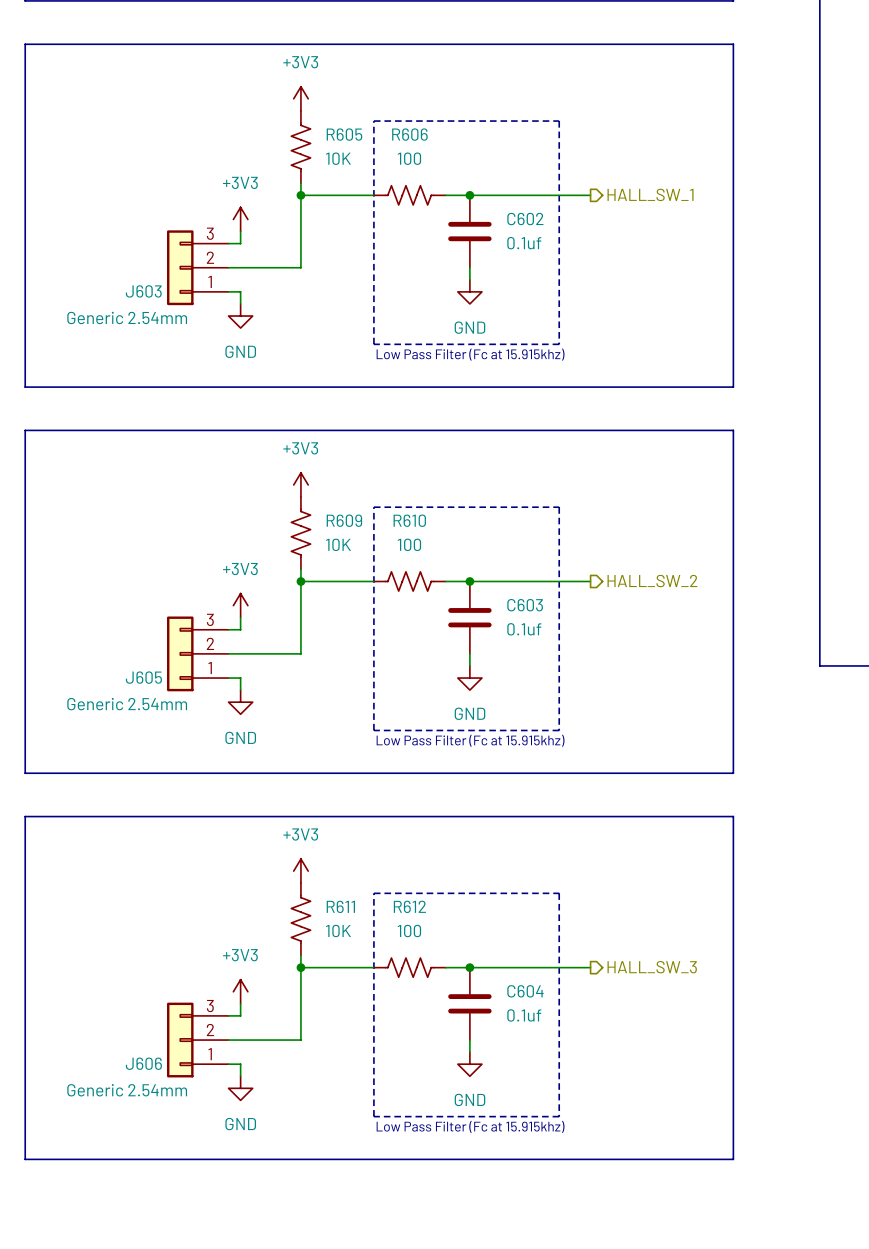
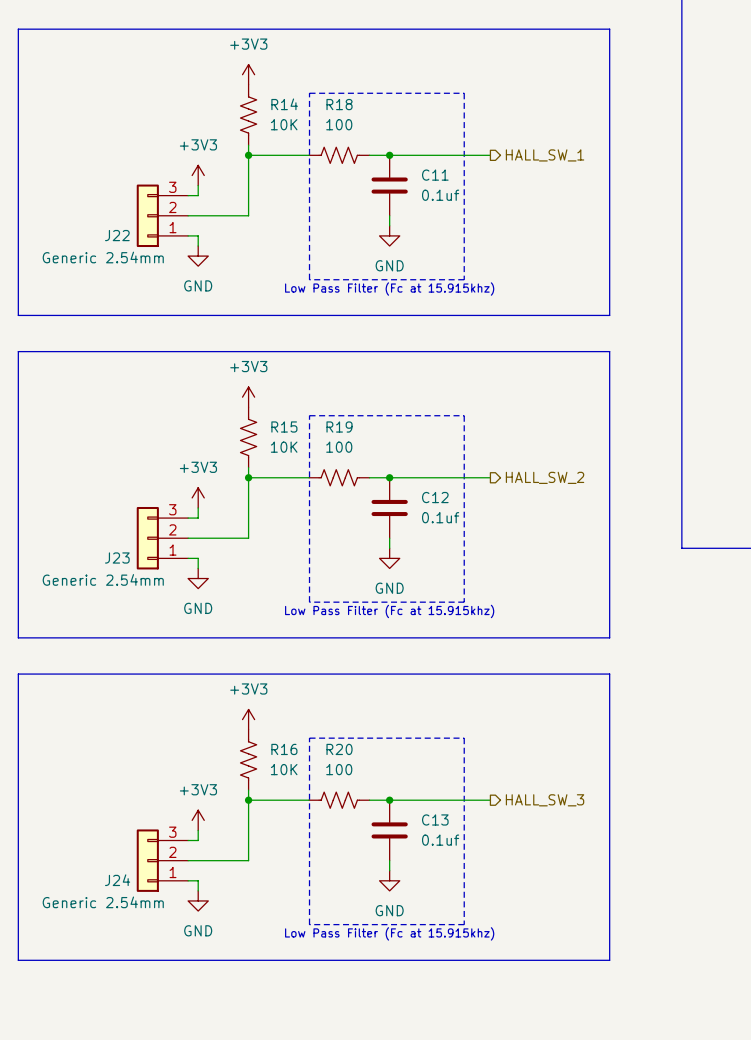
R605 name: R605 (344, 134) -> R14 (284, 104)
R606 name: R606 (409, 134) -> R18 (339, 104)
C602 name: C602 (525, 219) -> C11 (435, 175)
J603 name: J603 (143, 291) -> J22 (117, 235)
R609 name: R609 (344, 520) -> R15 (284, 427)
R610 name: R610 (409, 520) -> R19 (339, 427)
C603 name: C603 (525, 605) -> C12 (435, 497)
J605 name: J605 (143, 677) -> J23 (117, 558)
R611 name: R611 (340, 906) -> R16 (284, 749)
R612 name: R612 (409, 906) -> R20 (339, 749)
C604 name: C604 (525, 991) -> C13 (435, 819)
J606 name: J606 (143, 1063) -> J24 (117, 880)

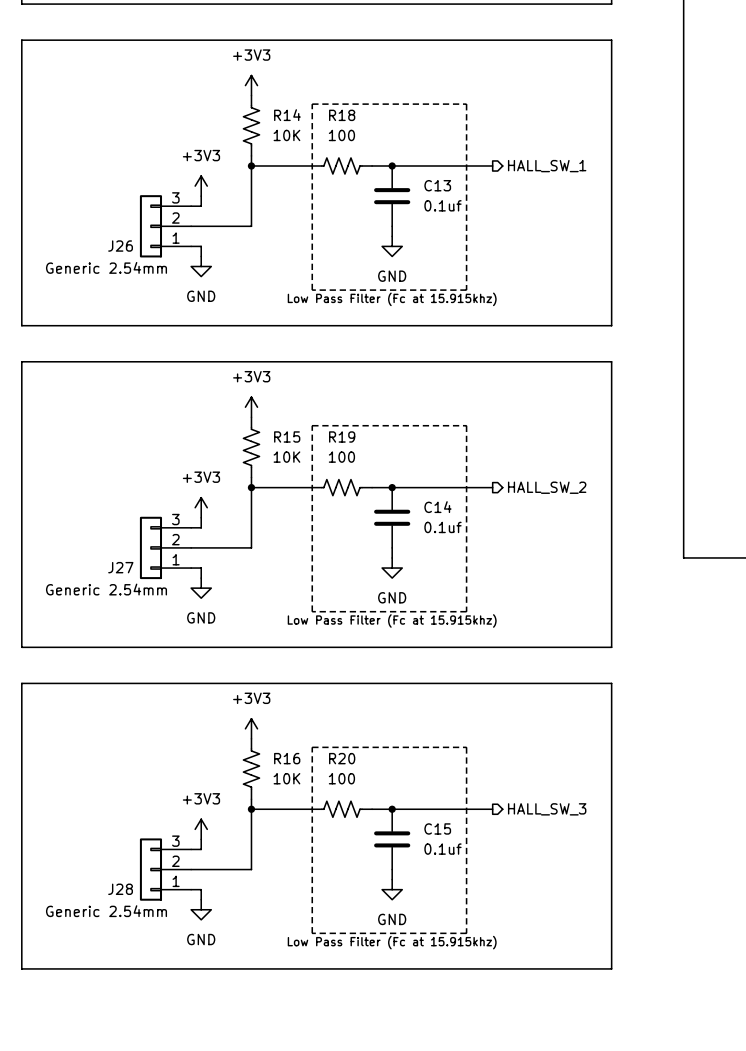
C11 name: C11 (435, 175) -> C13 (437, 185)
J22 name: J22 (117, 235) -> J26 (120, 246)
C12 name: C12 (435, 497) -> C14 (437, 507)
J23 name: J23 (117, 558) -> J27 (120, 567)
C13 name: C13 (435, 819) -> C15 (437, 828)
J24 name: J24 (117, 880) -> J28 (120, 889)

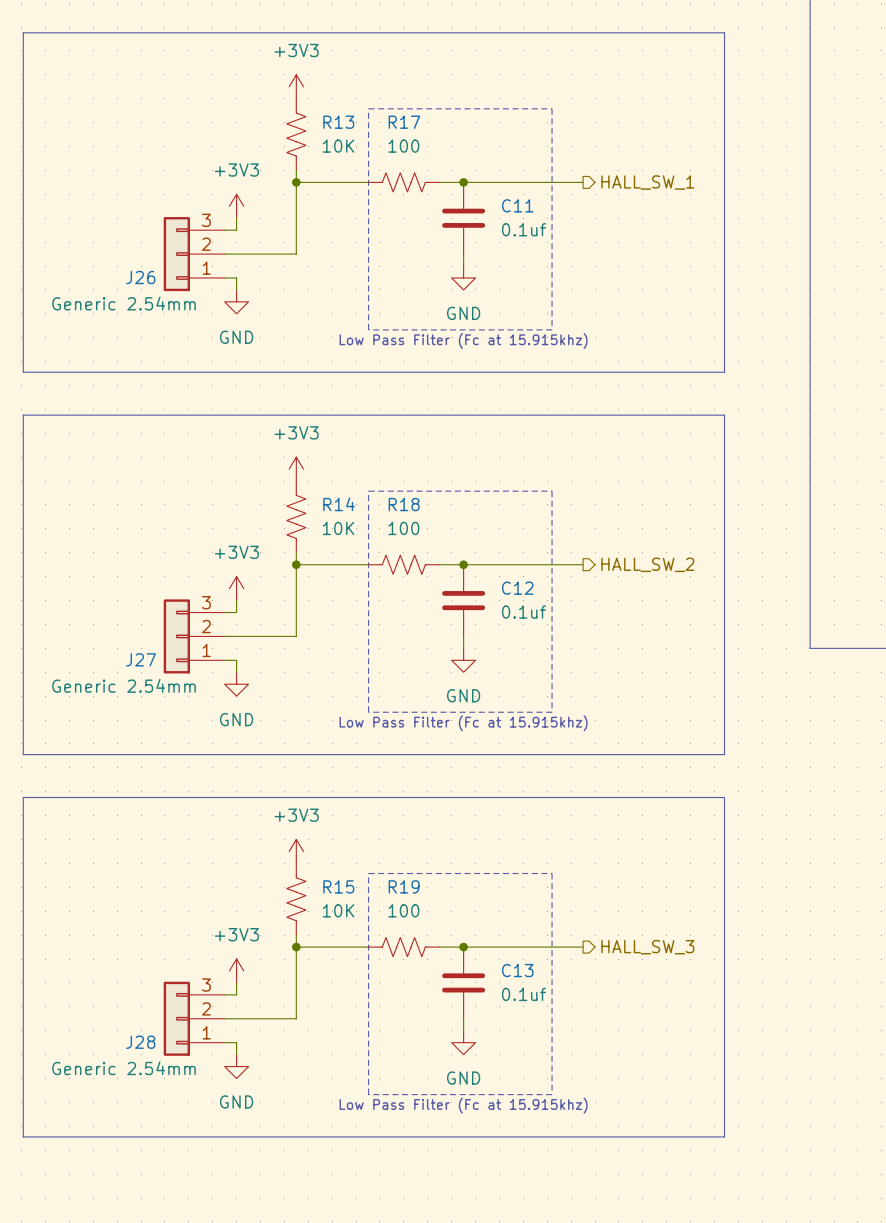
R14 name: R14 (287, 115) -> R13 (338, 122)
R18 name: R18 (342, 115) -> R17 (404, 122)
C13 name: C13 (437, 185) -> C11 (517, 205)
R15 name: R15 (287, 436) -> R14 (339, 504)
R19 name: R19 (342, 436) -> R18 (404, 504)
C14 name: C14 (437, 507) -> C12 (517, 588)
R16 name: R16 (287, 758) -> R15 (338, 886)
R20 name: R20 (342, 758) -> R19 (404, 886)
C15 name: C15 (437, 828) -> C13 (517, 970)

